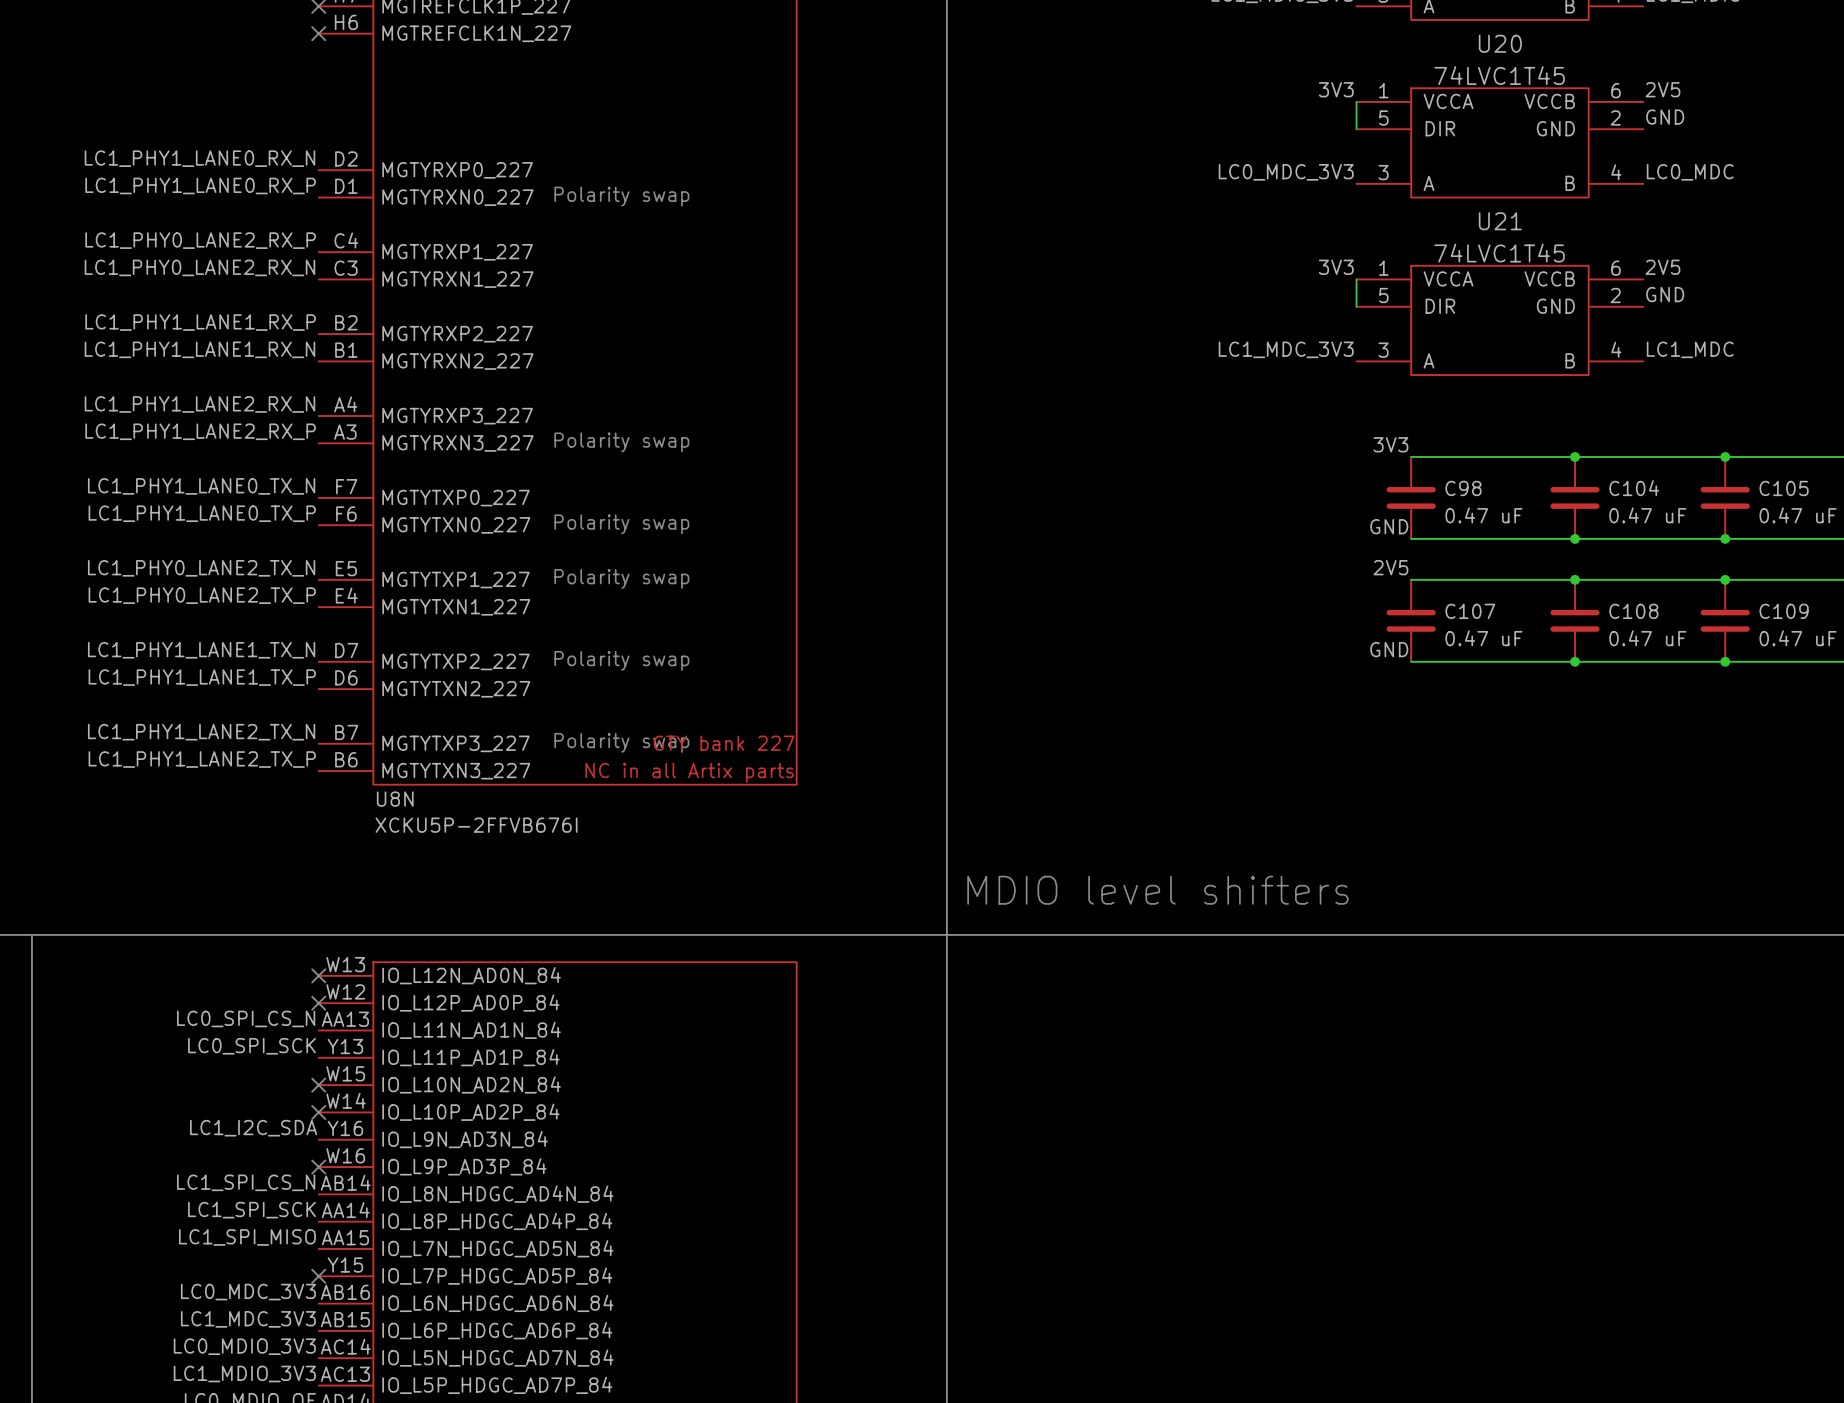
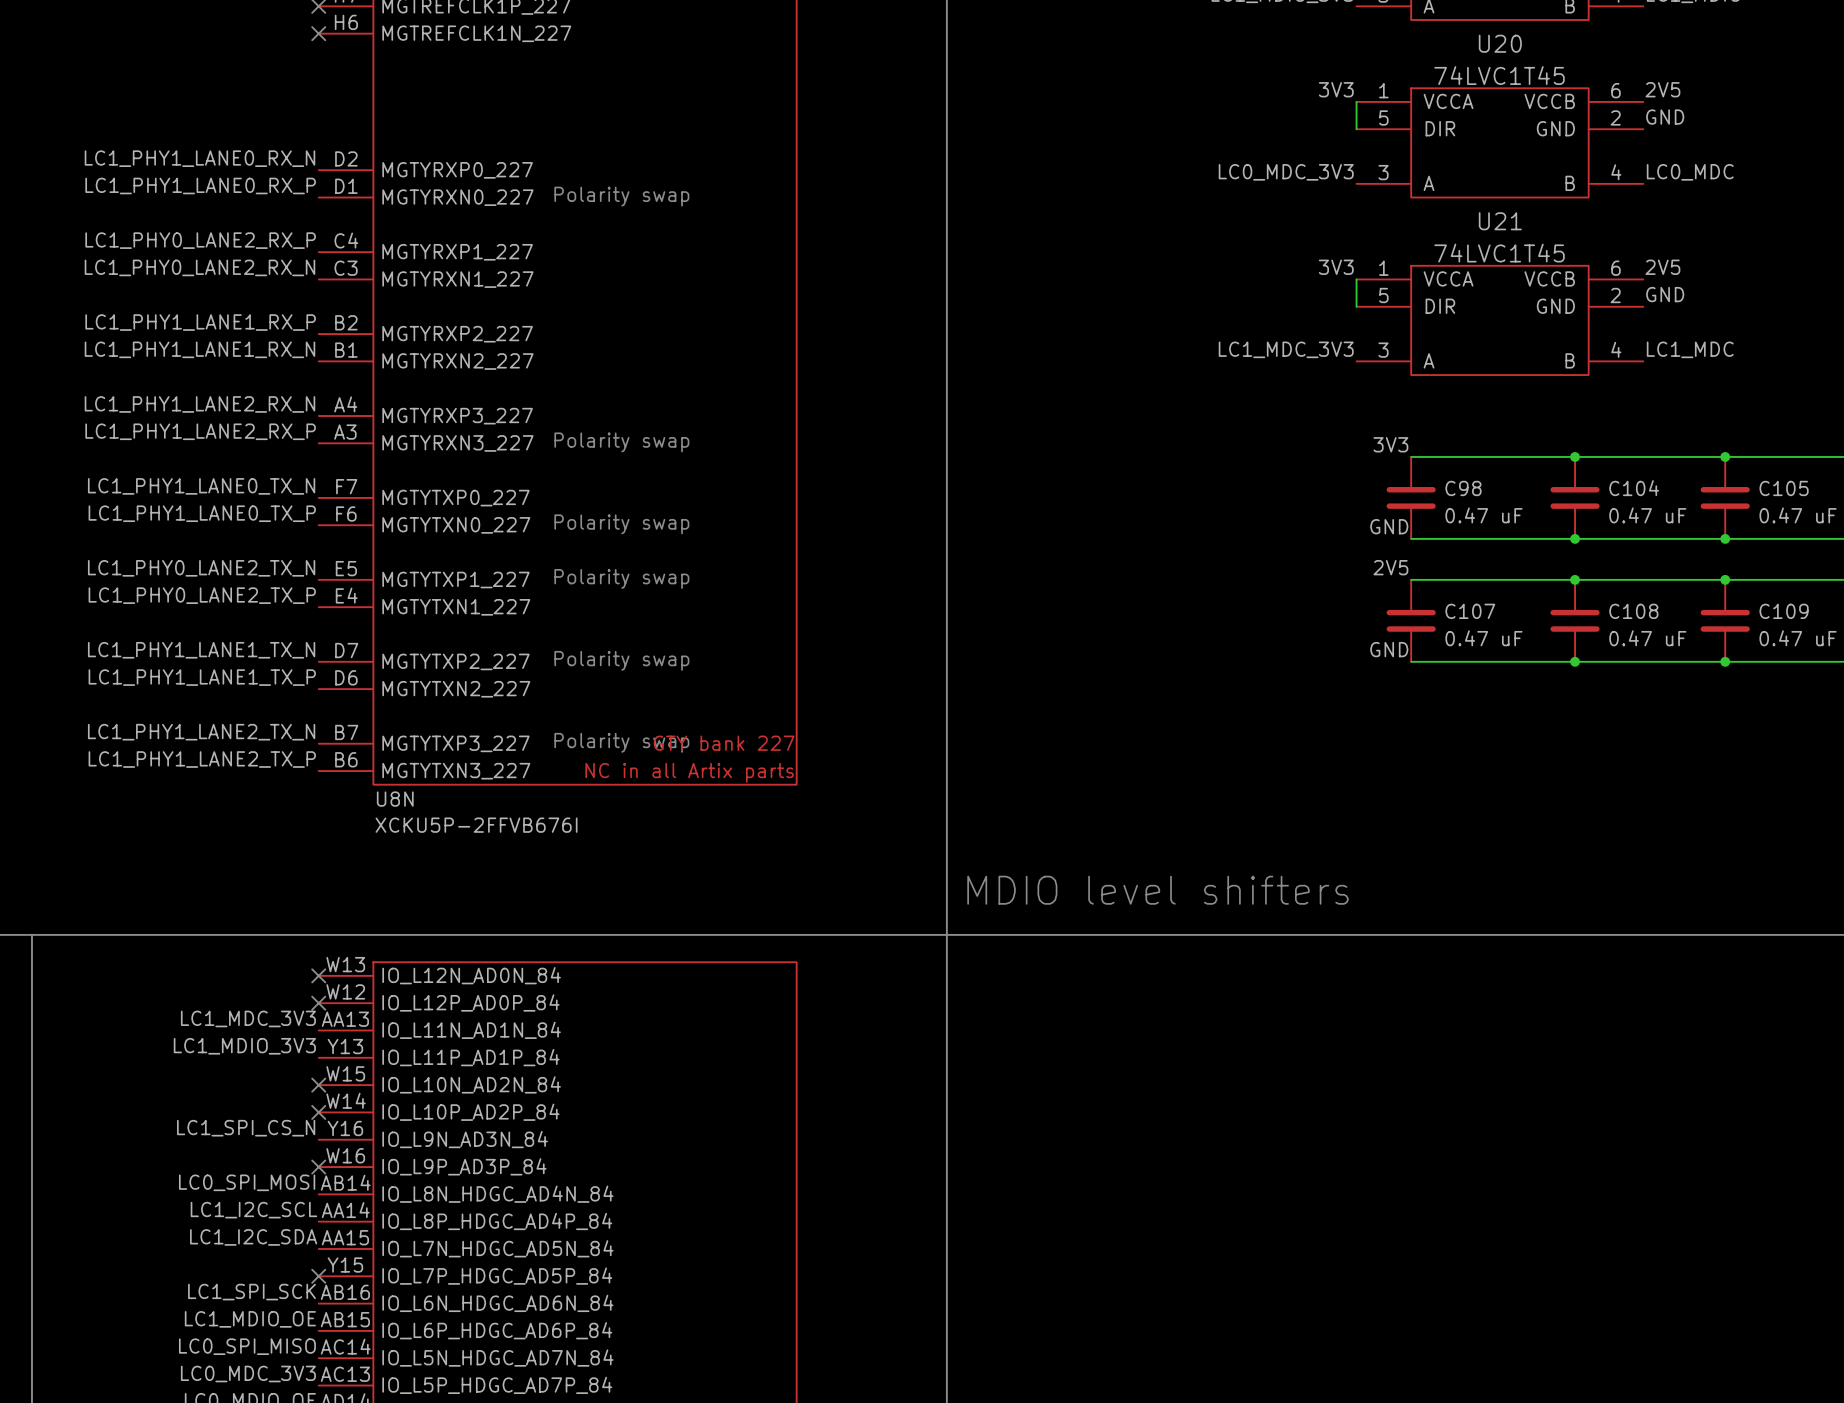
label: LC0_SPI_CS_N (246, 1018) -> LC1_MDC_3V3 (248, 1018)
label: LC0_SPI_SCK (251, 1046) -> LC1_MDIO_3V3 (244, 1046)
label: LC1_I2C_SDA (253, 1128) -> LC1_SPI_CS_N (246, 1128)
label: LC1_SPI_CS_N (246, 1182) -> LC0_SPI_MOSI (247, 1182)
label: LC1_SPI_SCK (251, 1210) -> LC1_I2C_SCL (253, 1210)
label: LC1_SPI_MISO (247, 1237) -> LC1_I2C_SDA (253, 1237)
label: LC0_MDC_3V3 (248, 1292) -> LC1_SPI_SCK (251, 1292)
label: LC1_MDC_3V3 (248, 1319) -> LC1_MDIO_OE (250, 1319)
label: LC0_MDIO_3V3 (244, 1346) -> LC0_SPI_MISO (247, 1346)
label: LC1_MDIO_3V3 (244, 1373) -> LC0_MDC_3V3 (248, 1373)

